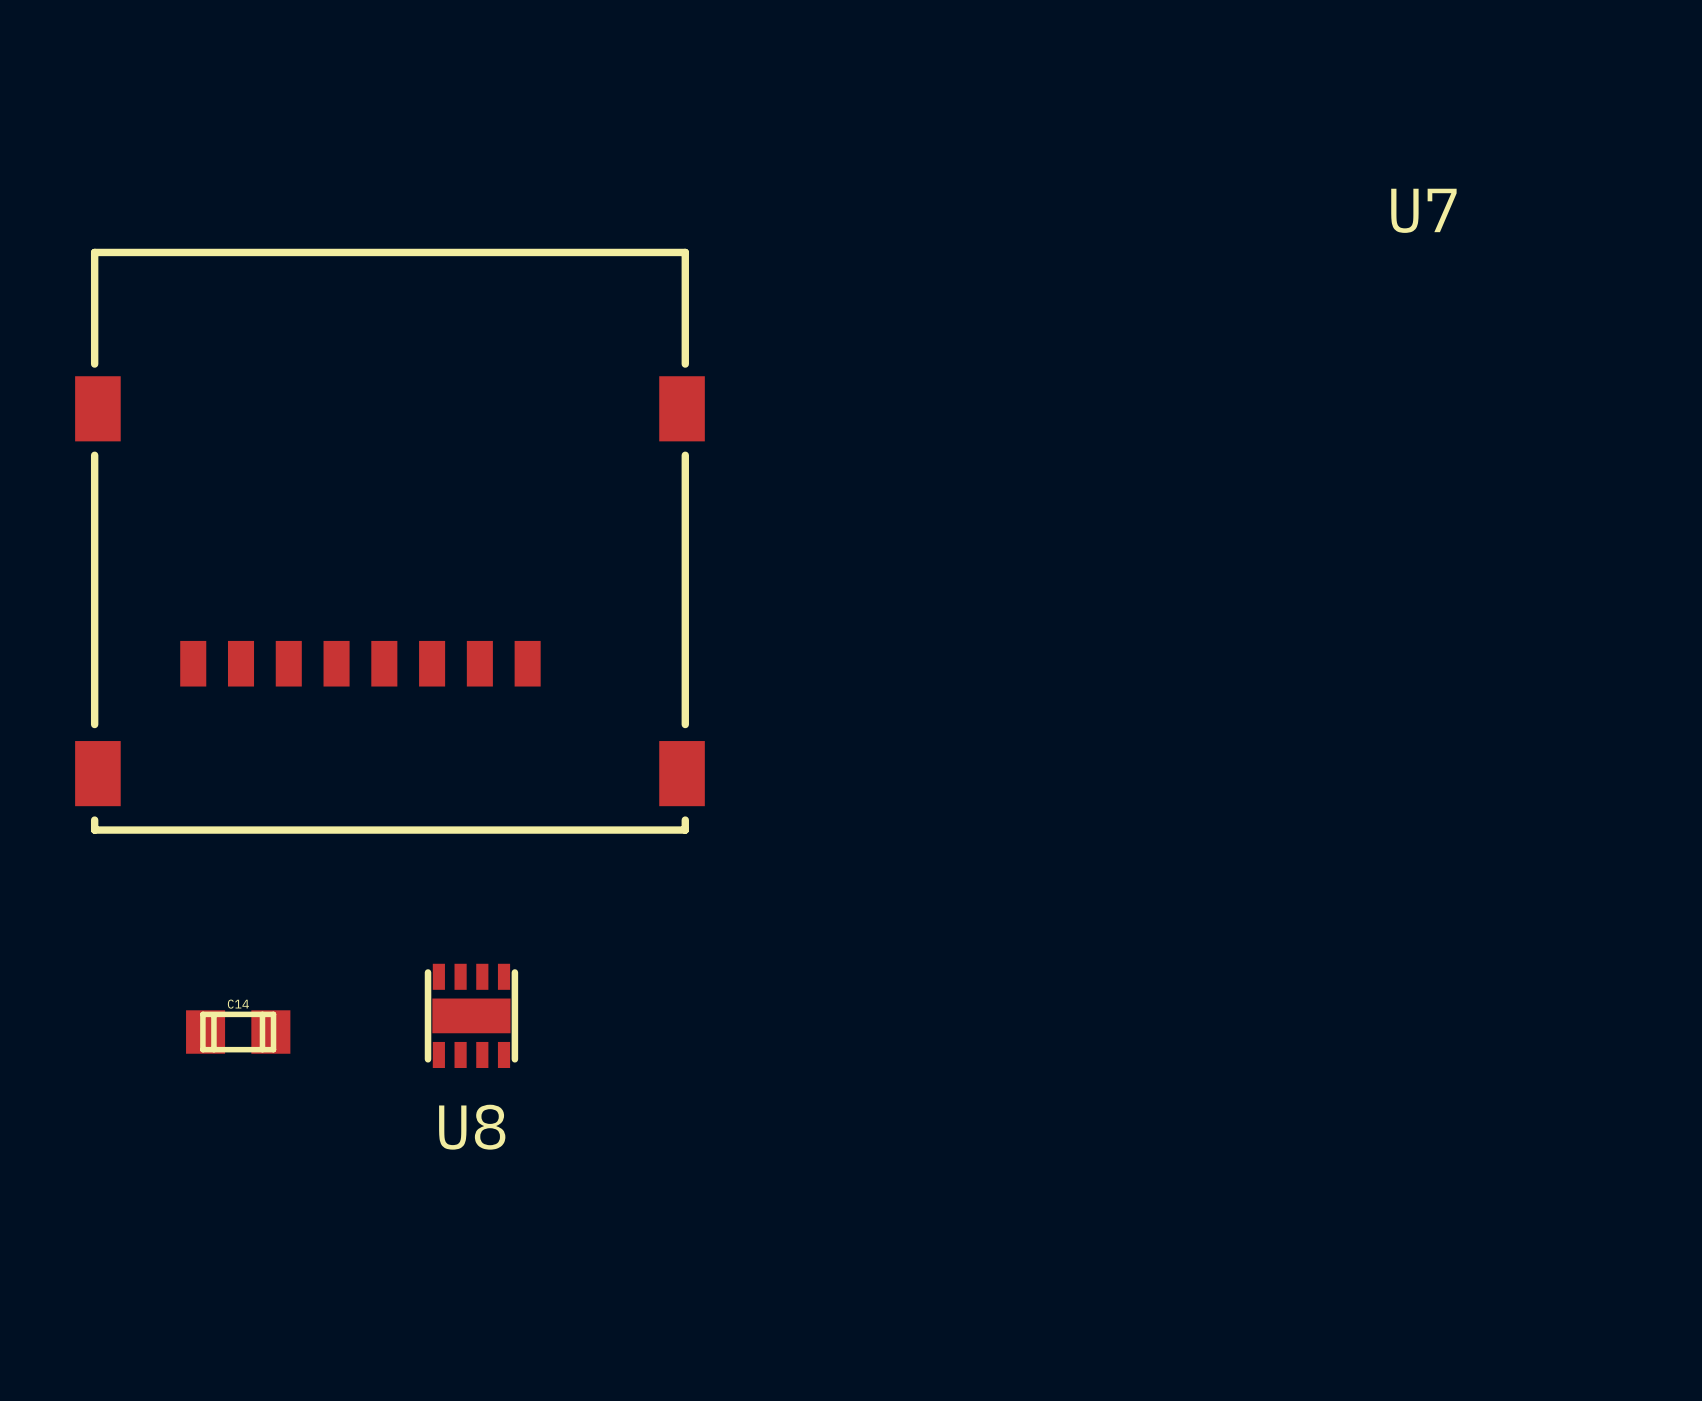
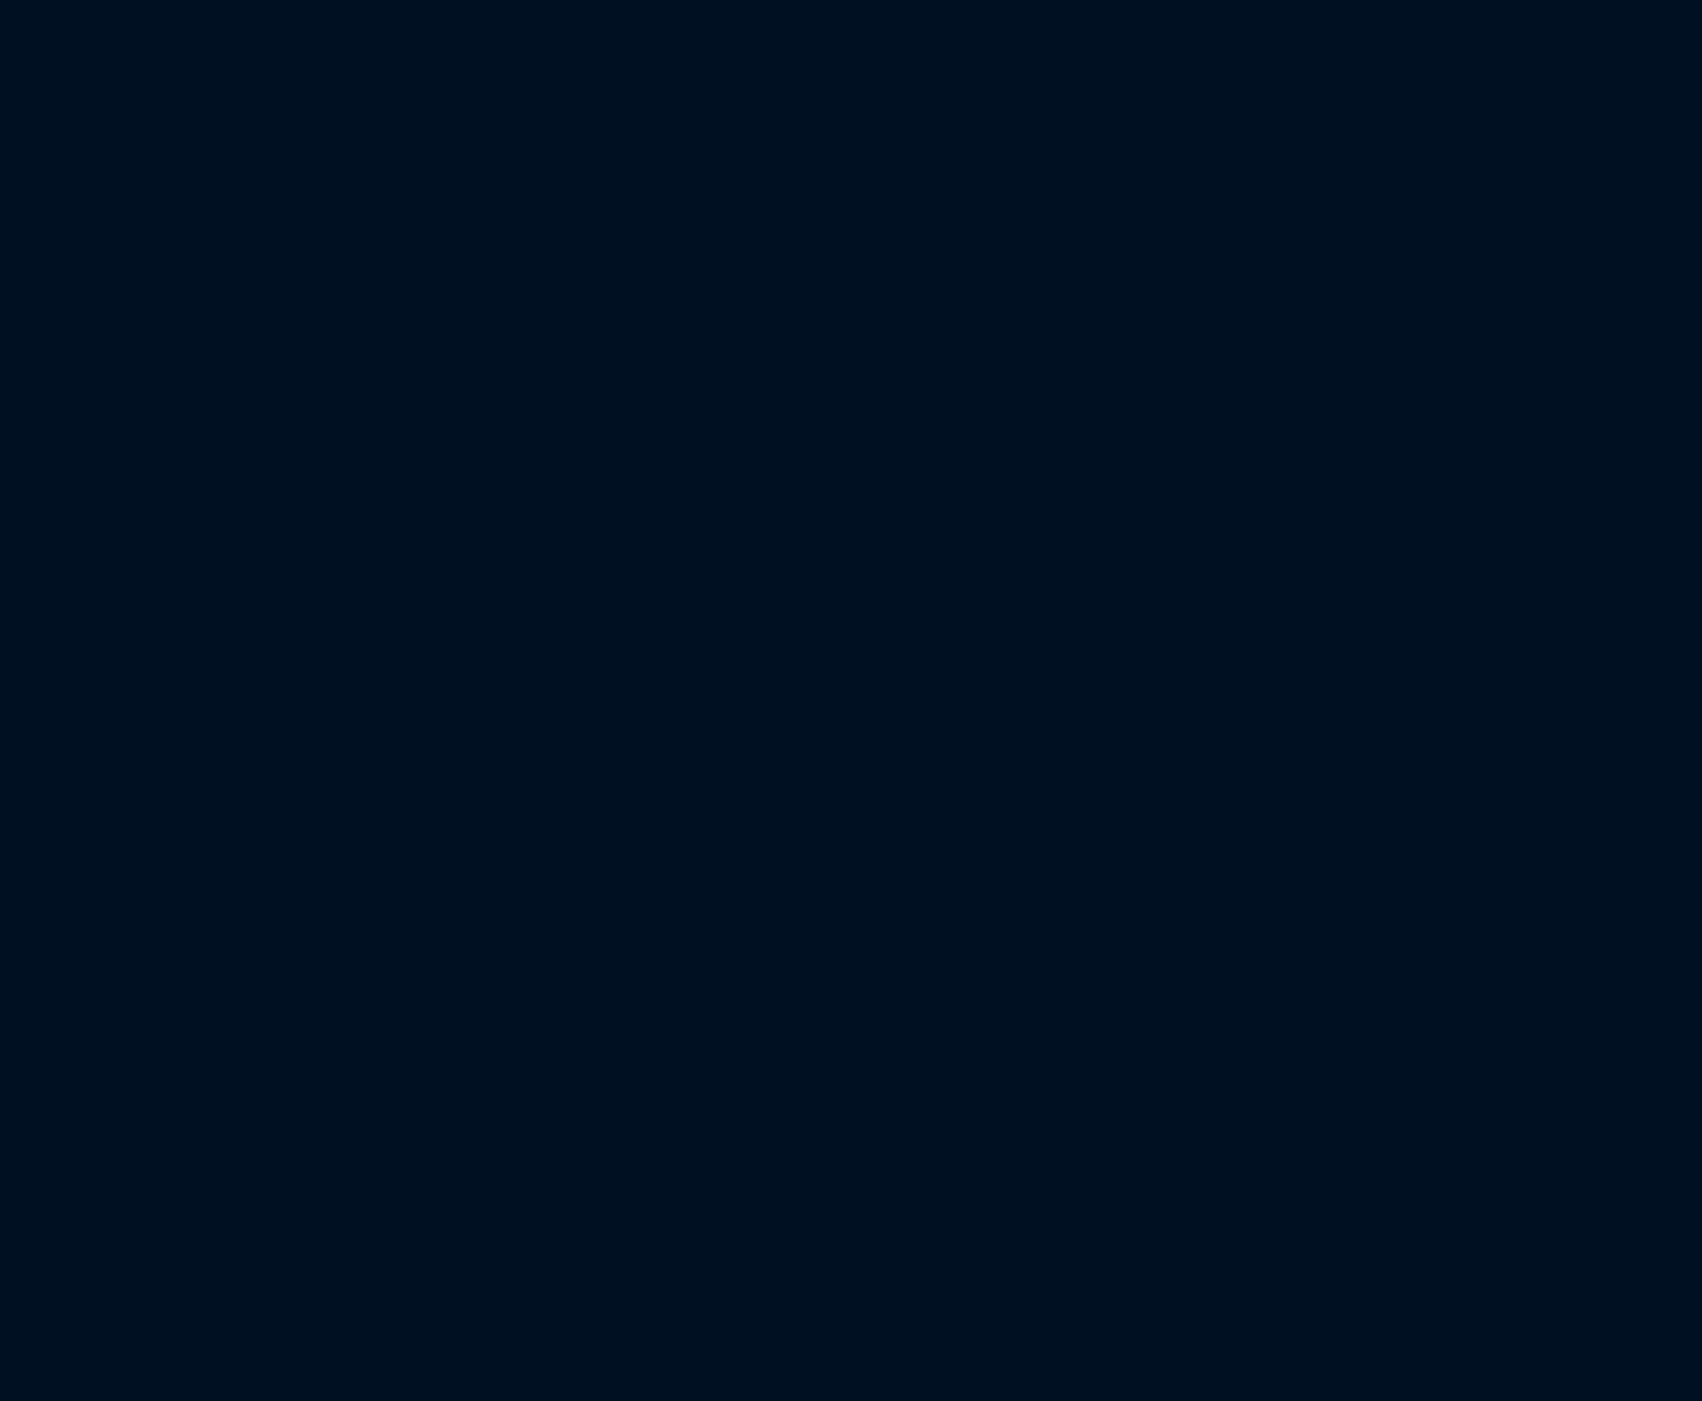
U7: (389, 541) -> none
U8: (471, 1015) -> none
C14: (238, 1032) -> none

